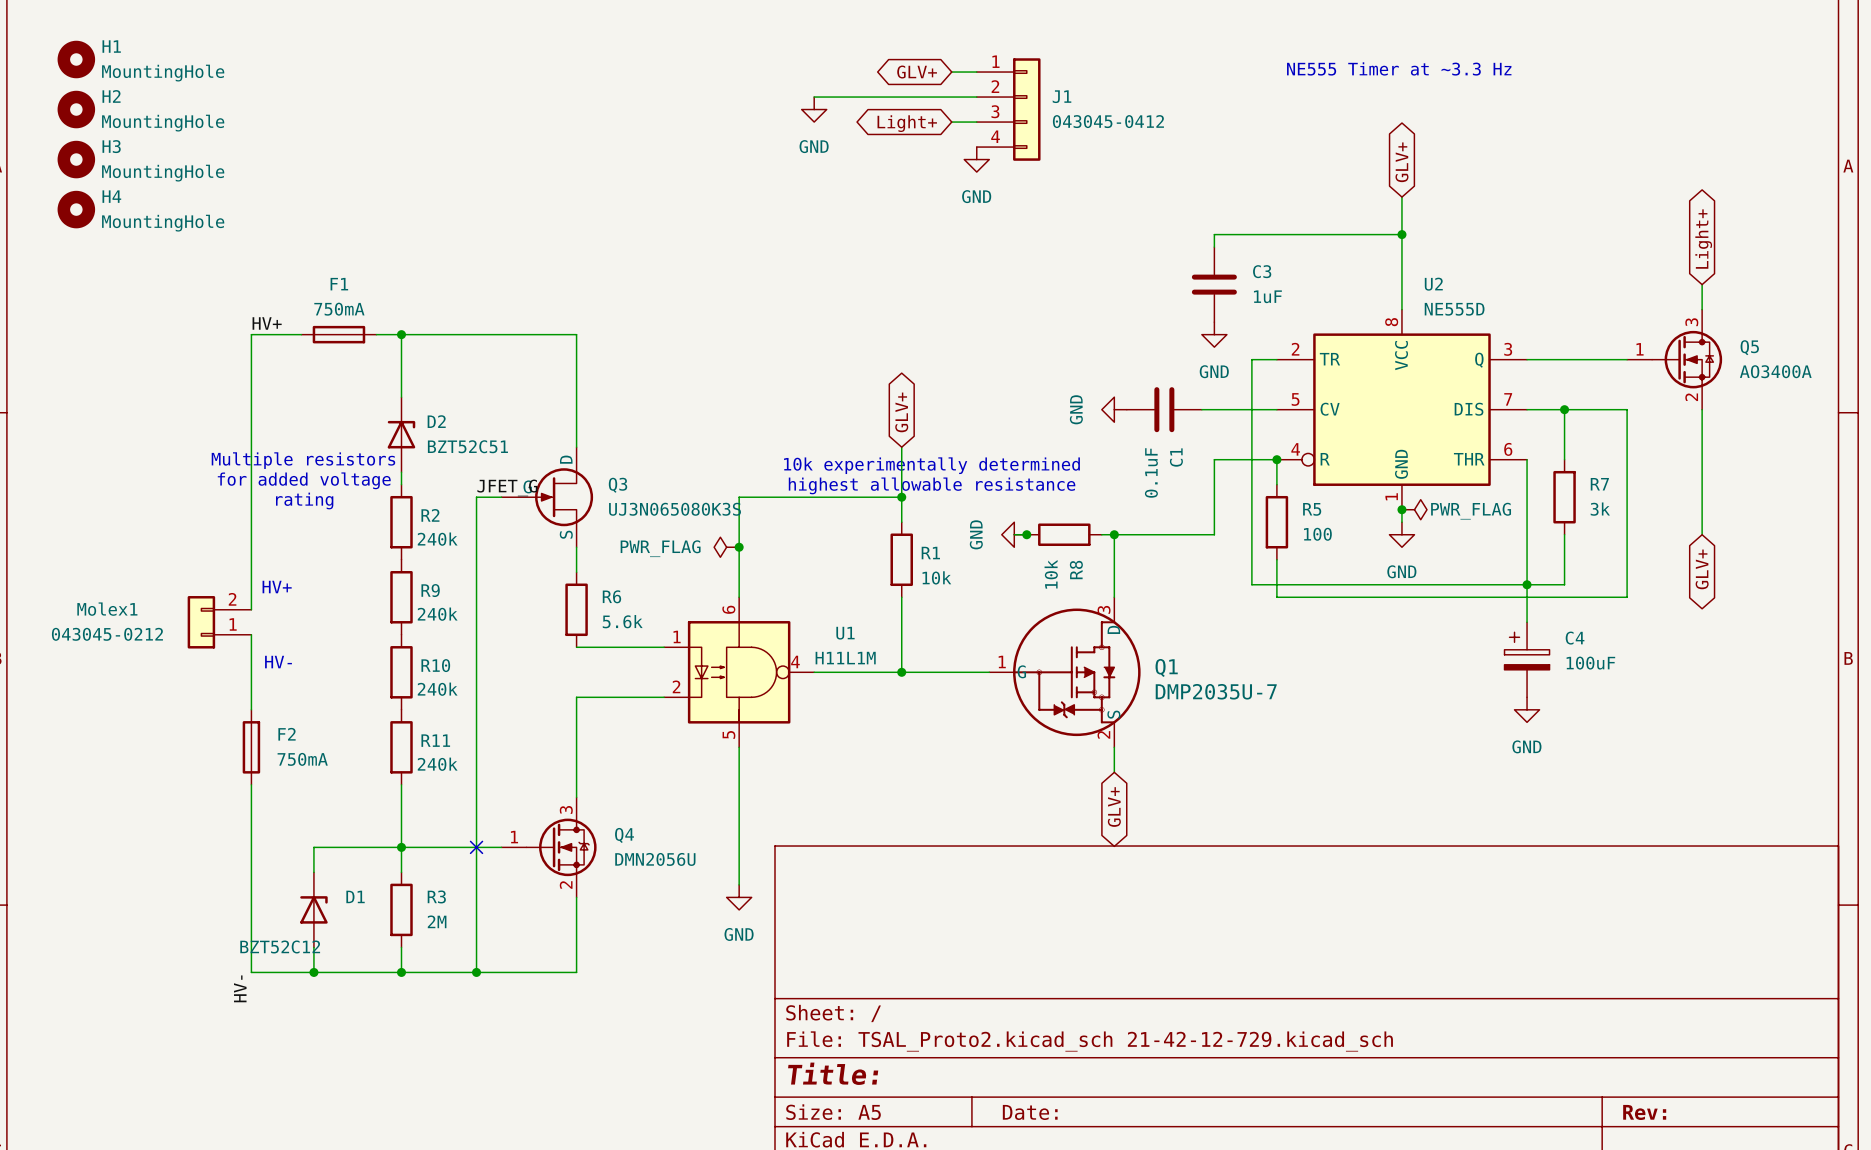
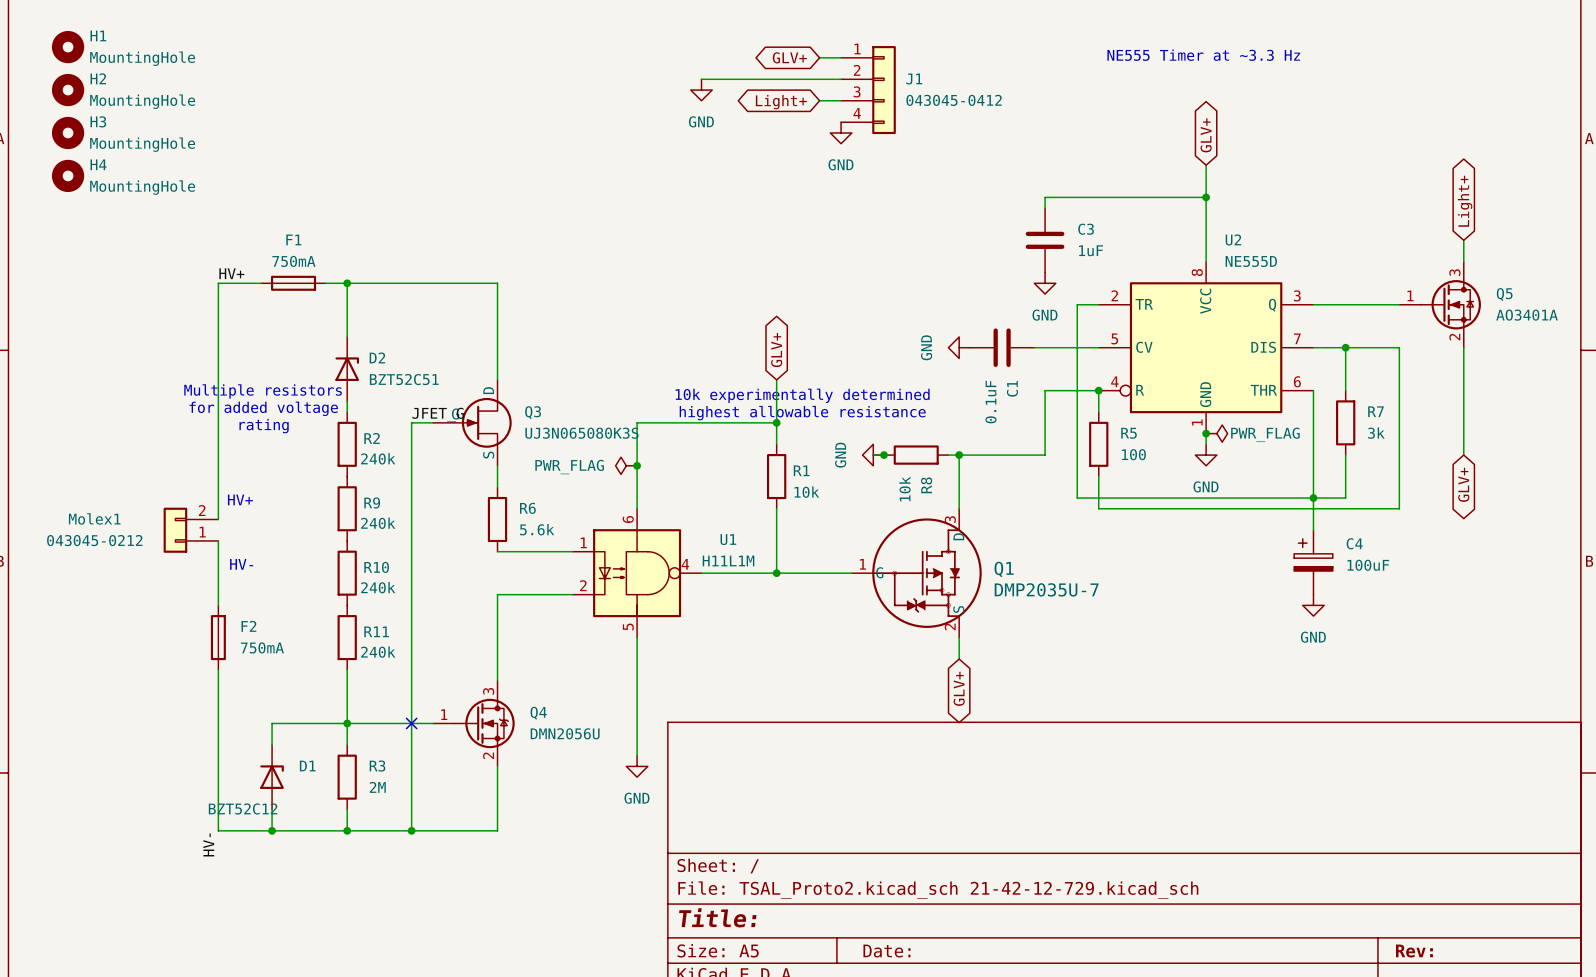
Q5 value: AO3400A (1775, 371) -> AO3401A (1527, 315)

